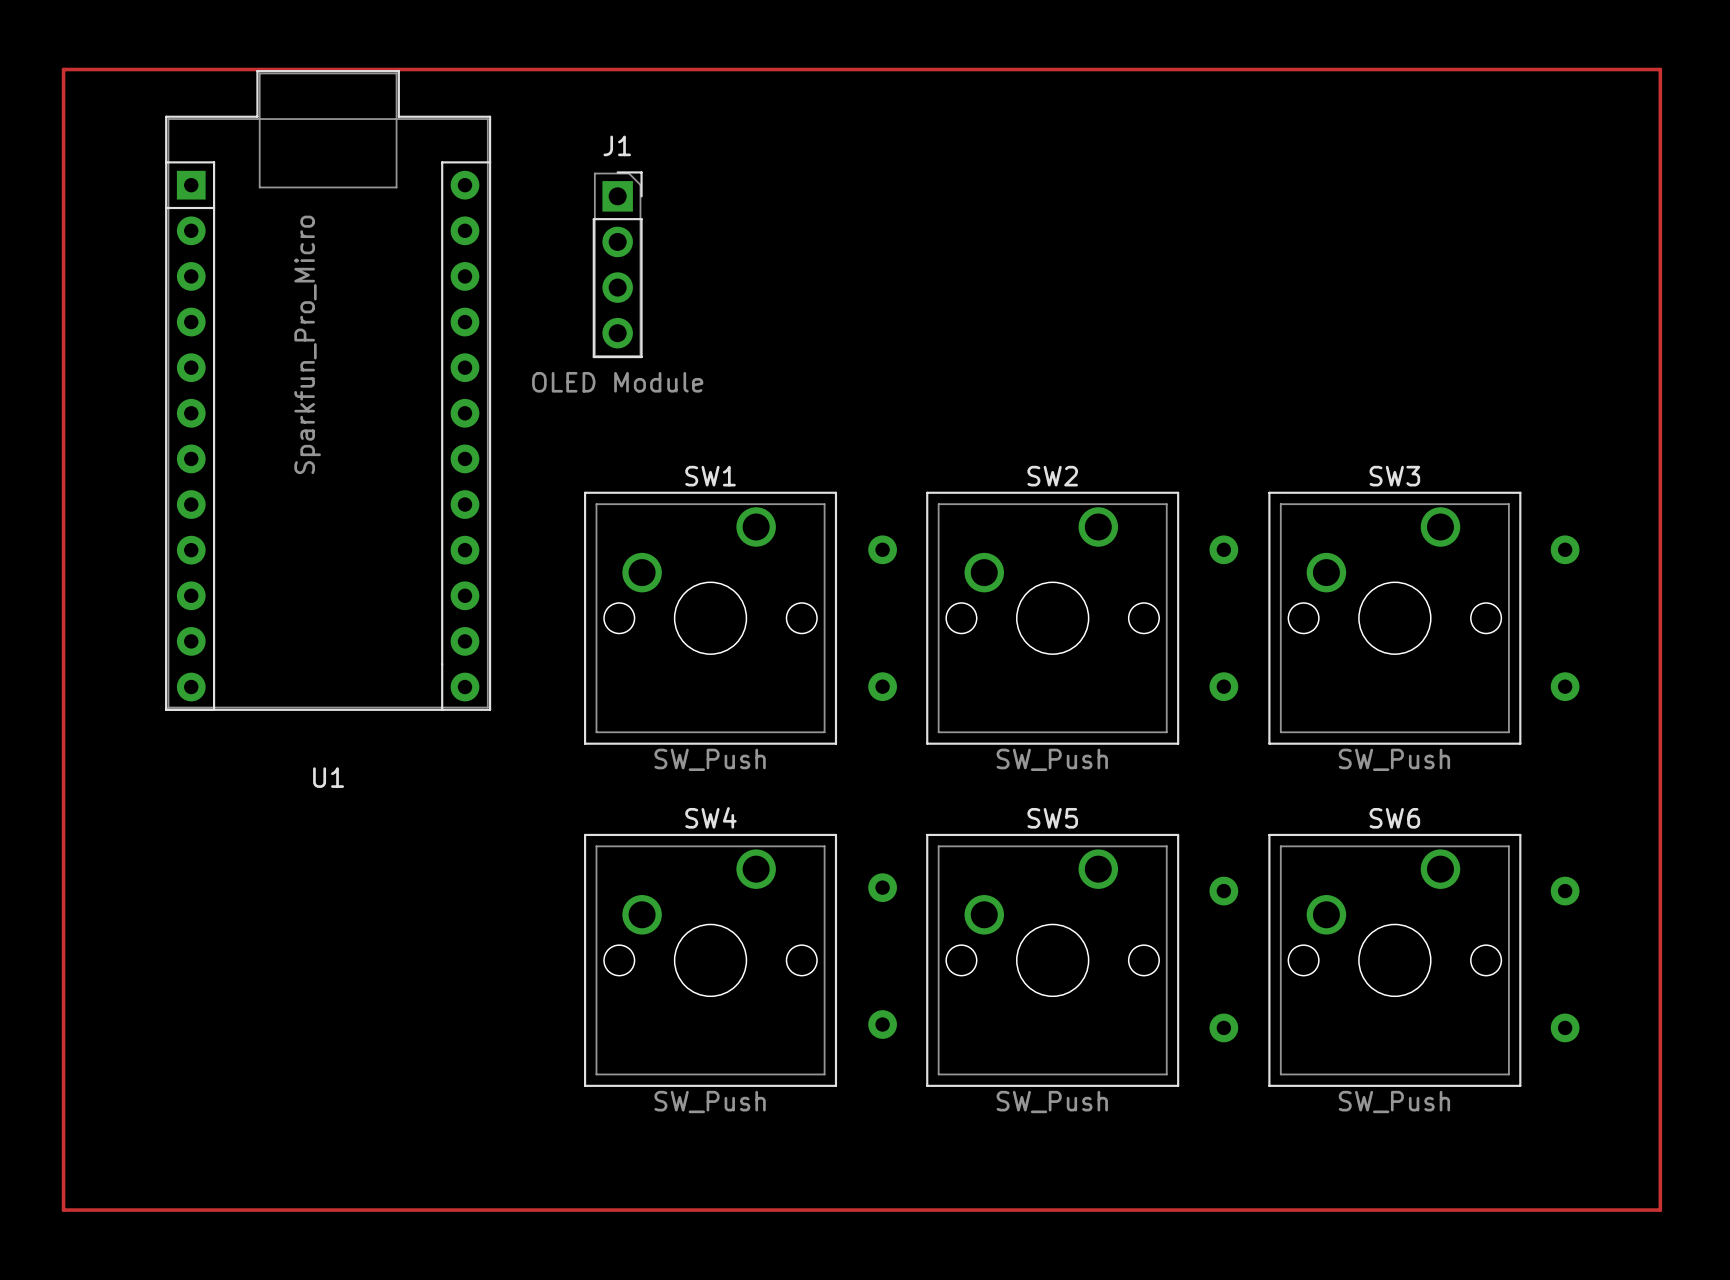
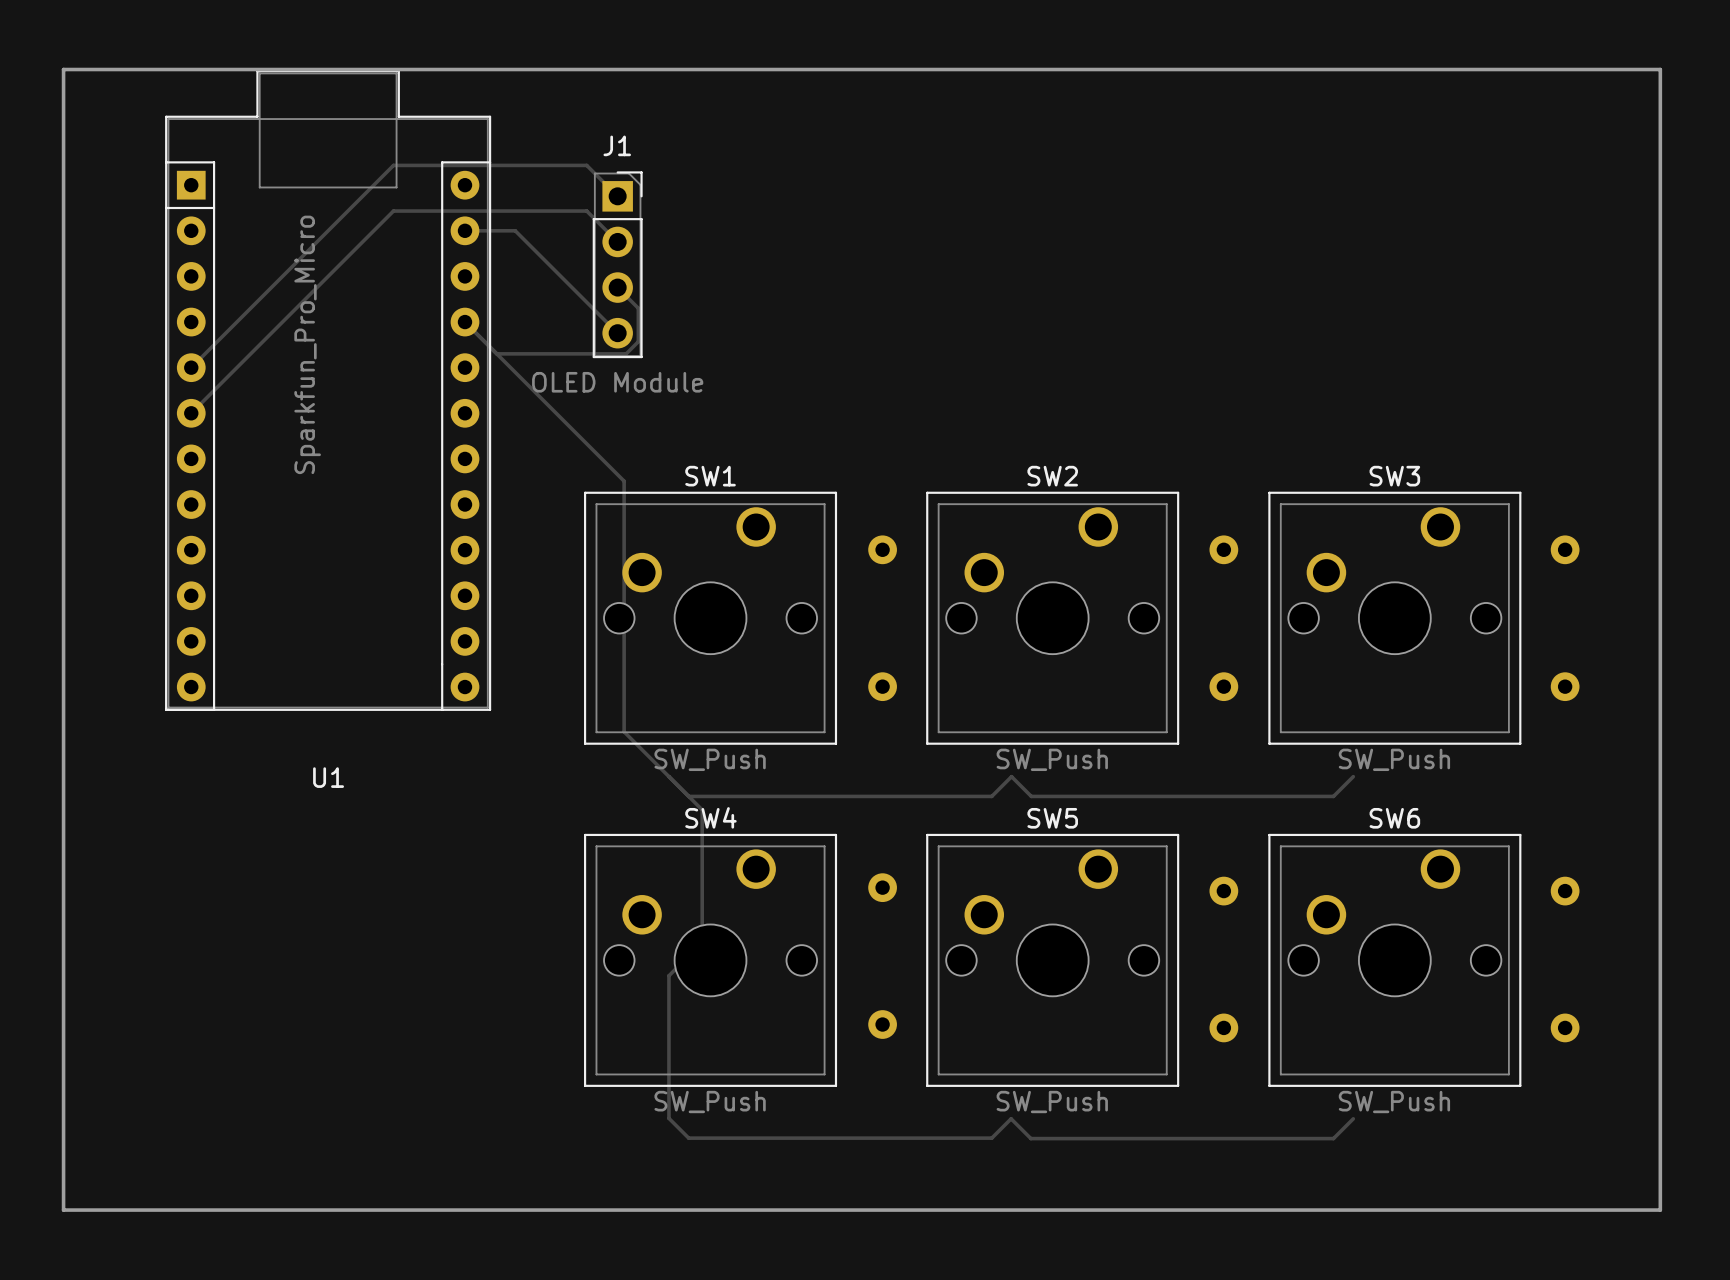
track: (63, 69) (1660, 69) (1660, 1210) (63, 1210) (63, 69) -> none
board edge: none -> (63, 69) (1660, 69) (1660, 1210) (63, 1210) (63, 69)
track: none -> (617, 196) (586, 165) (393, 165) (191, 367)
track: none -> (464, 230) (515, 230) (617, 333)
track: none -> (617, 241) (586, 211) (393, 211) (191, 413)
track: none -> (617, 287) (638, 308) (638, 341) (626, 353) (496, 353)
track: none -> (464, 322) (624, 481) (624, 731) (702, 809) (702, 942) (668, 975) (668, 1118) (688, 1138) (991, 1138) (1011, 1118) (1030, 1138) (1333, 1138) (1353, 1118)
track: none -> (1353, 776) (1333, 796) (1031, 796) (1011, 776) (991, 796) (688, 796)

